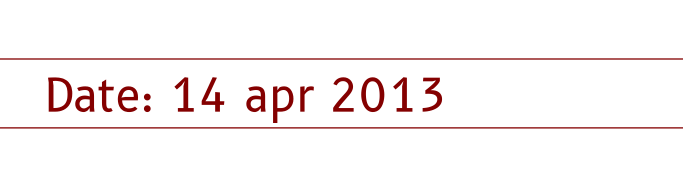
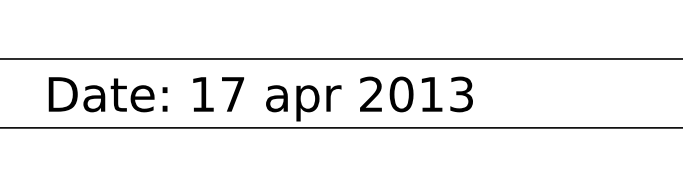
title block: Date: 14 apr 2013 (245, 100) -> Date: 17 apr 2013 (260, 99)

